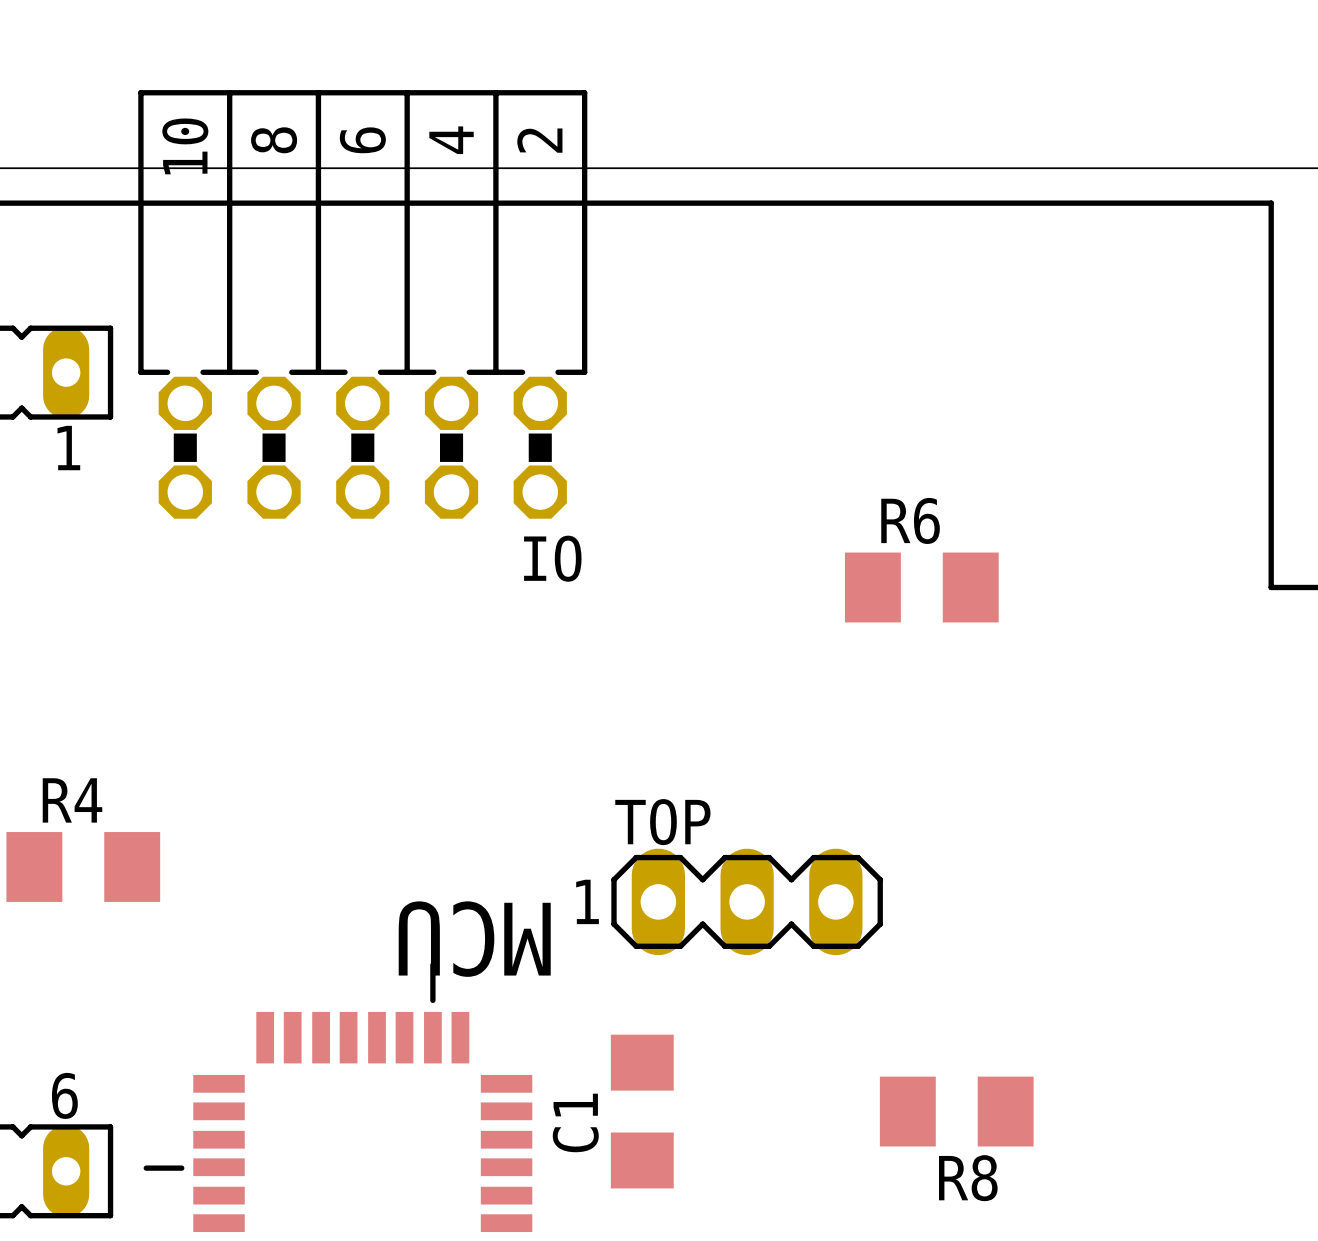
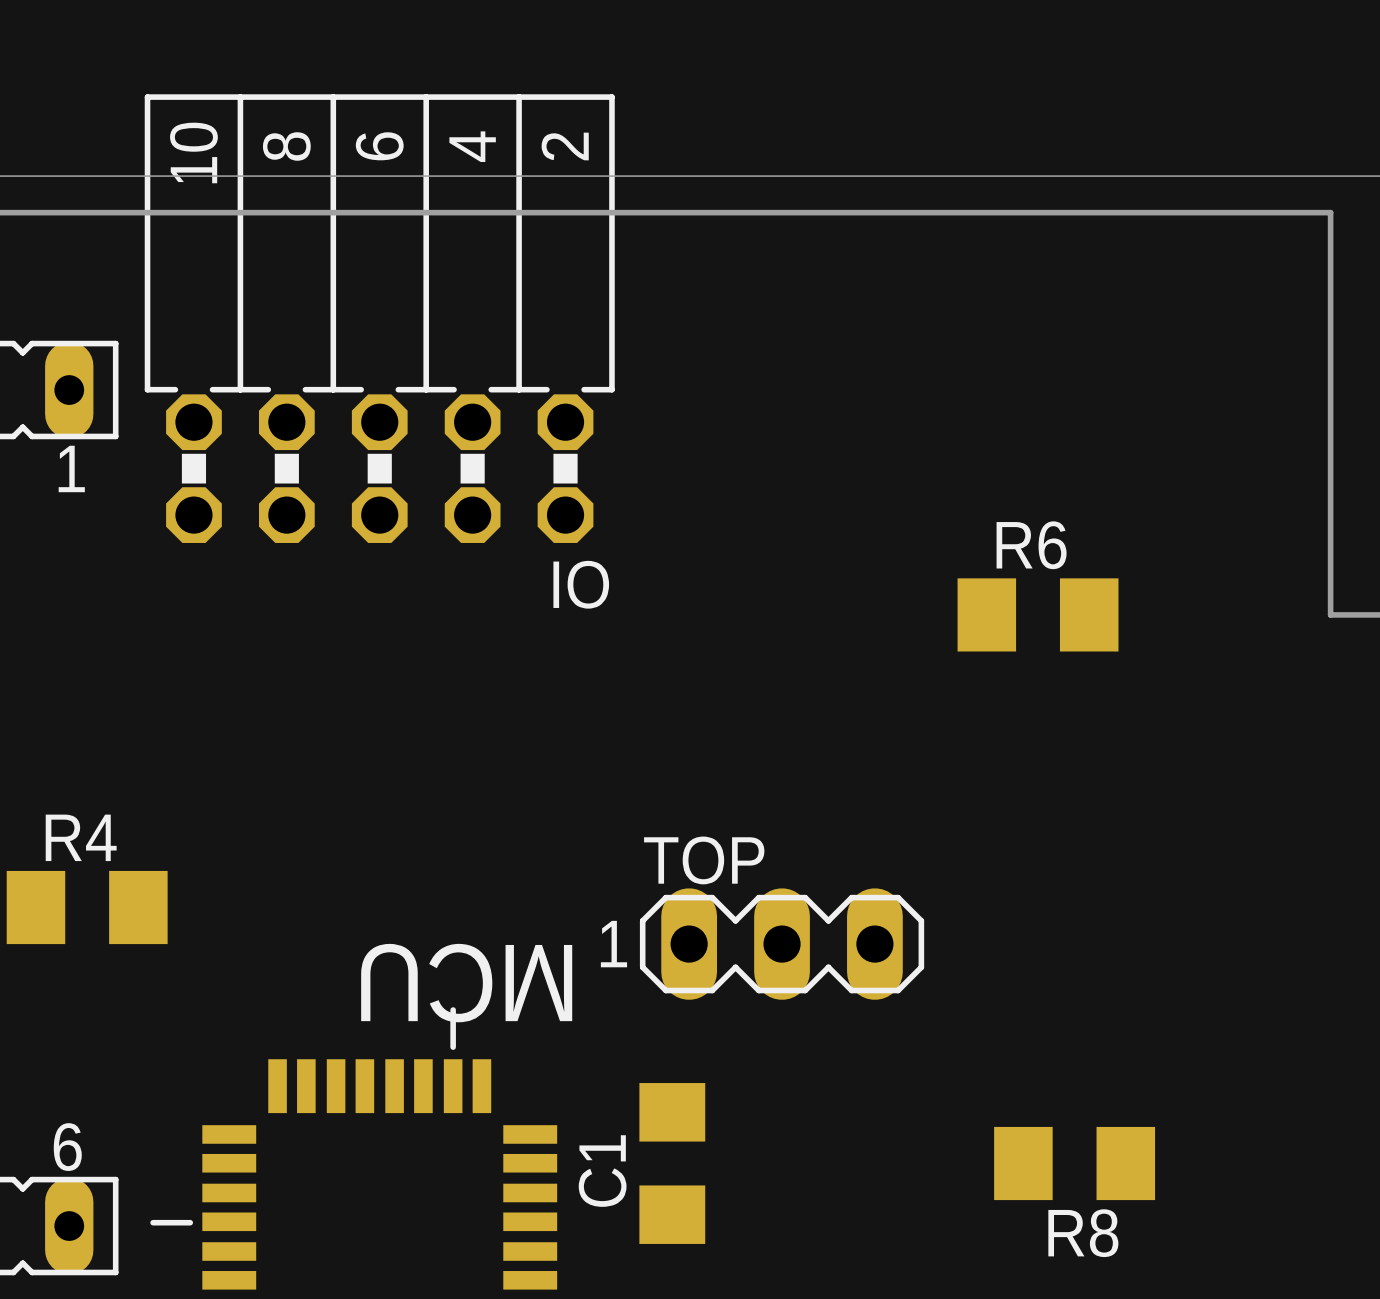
R6 position: (921, 587) -> (1038, 614)
R8 position: (956, 1111) -> (1074, 1163)

